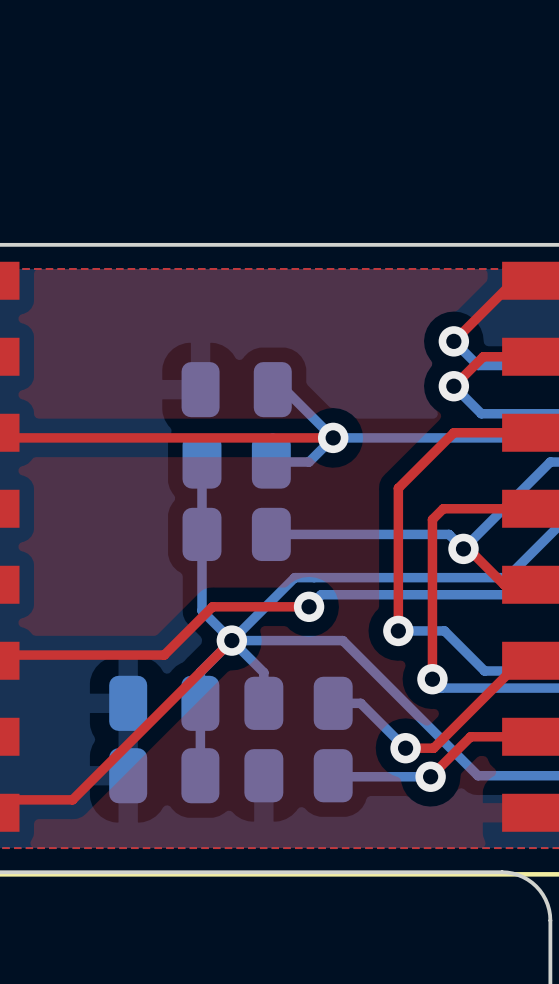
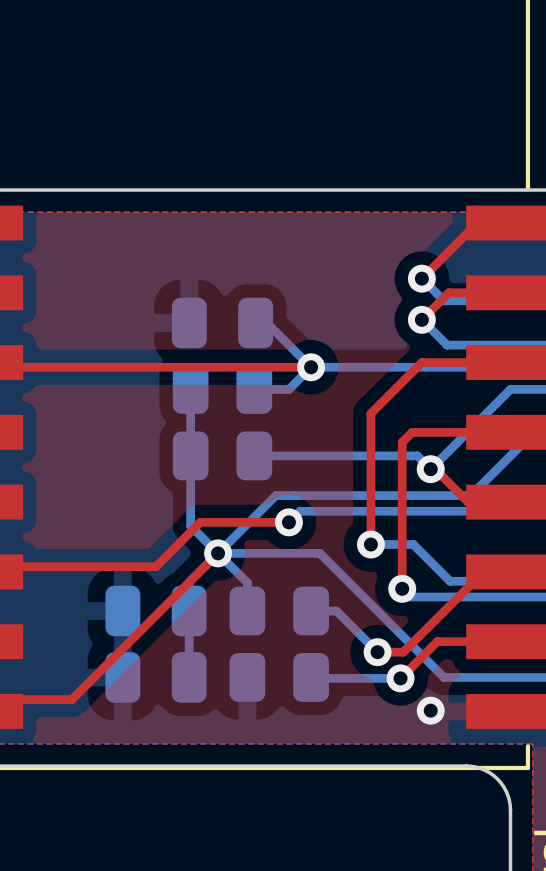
via: none -> (430, 710)

